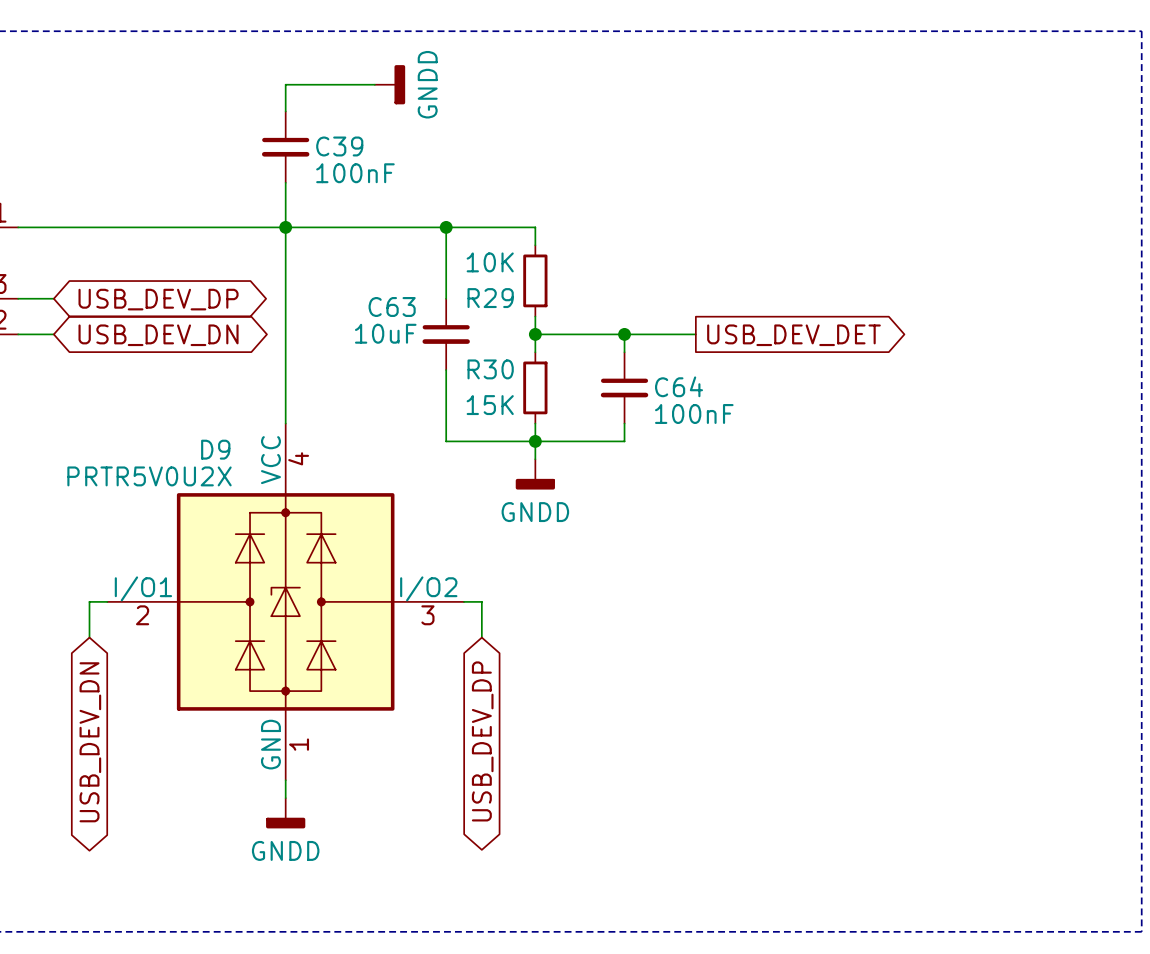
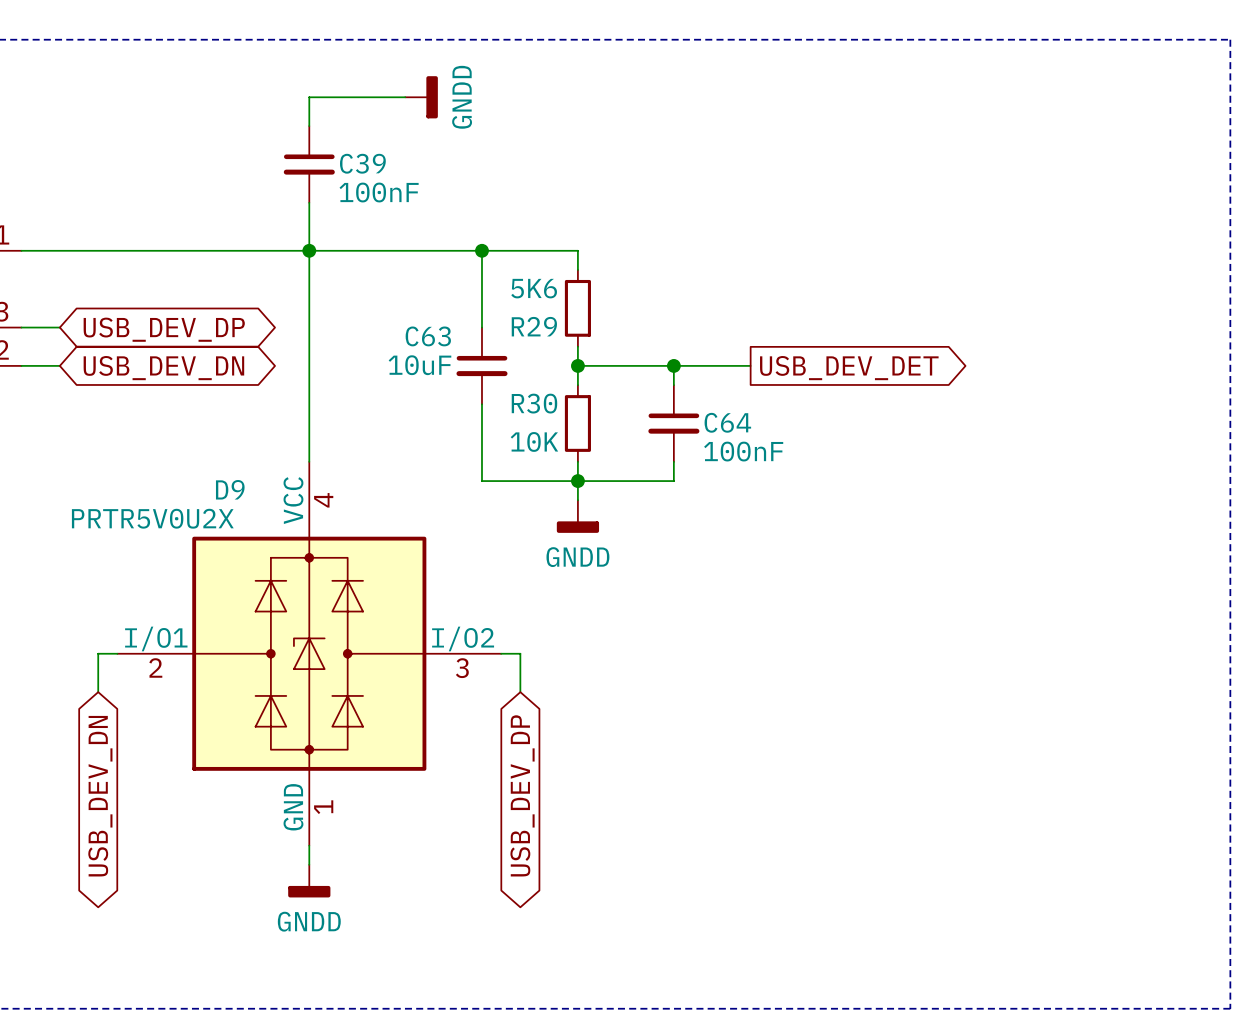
R29 value: 10K (490, 262) -> 5K6 (534, 288)
R30 value: 15K (490, 405) -> 10K (534, 441)

